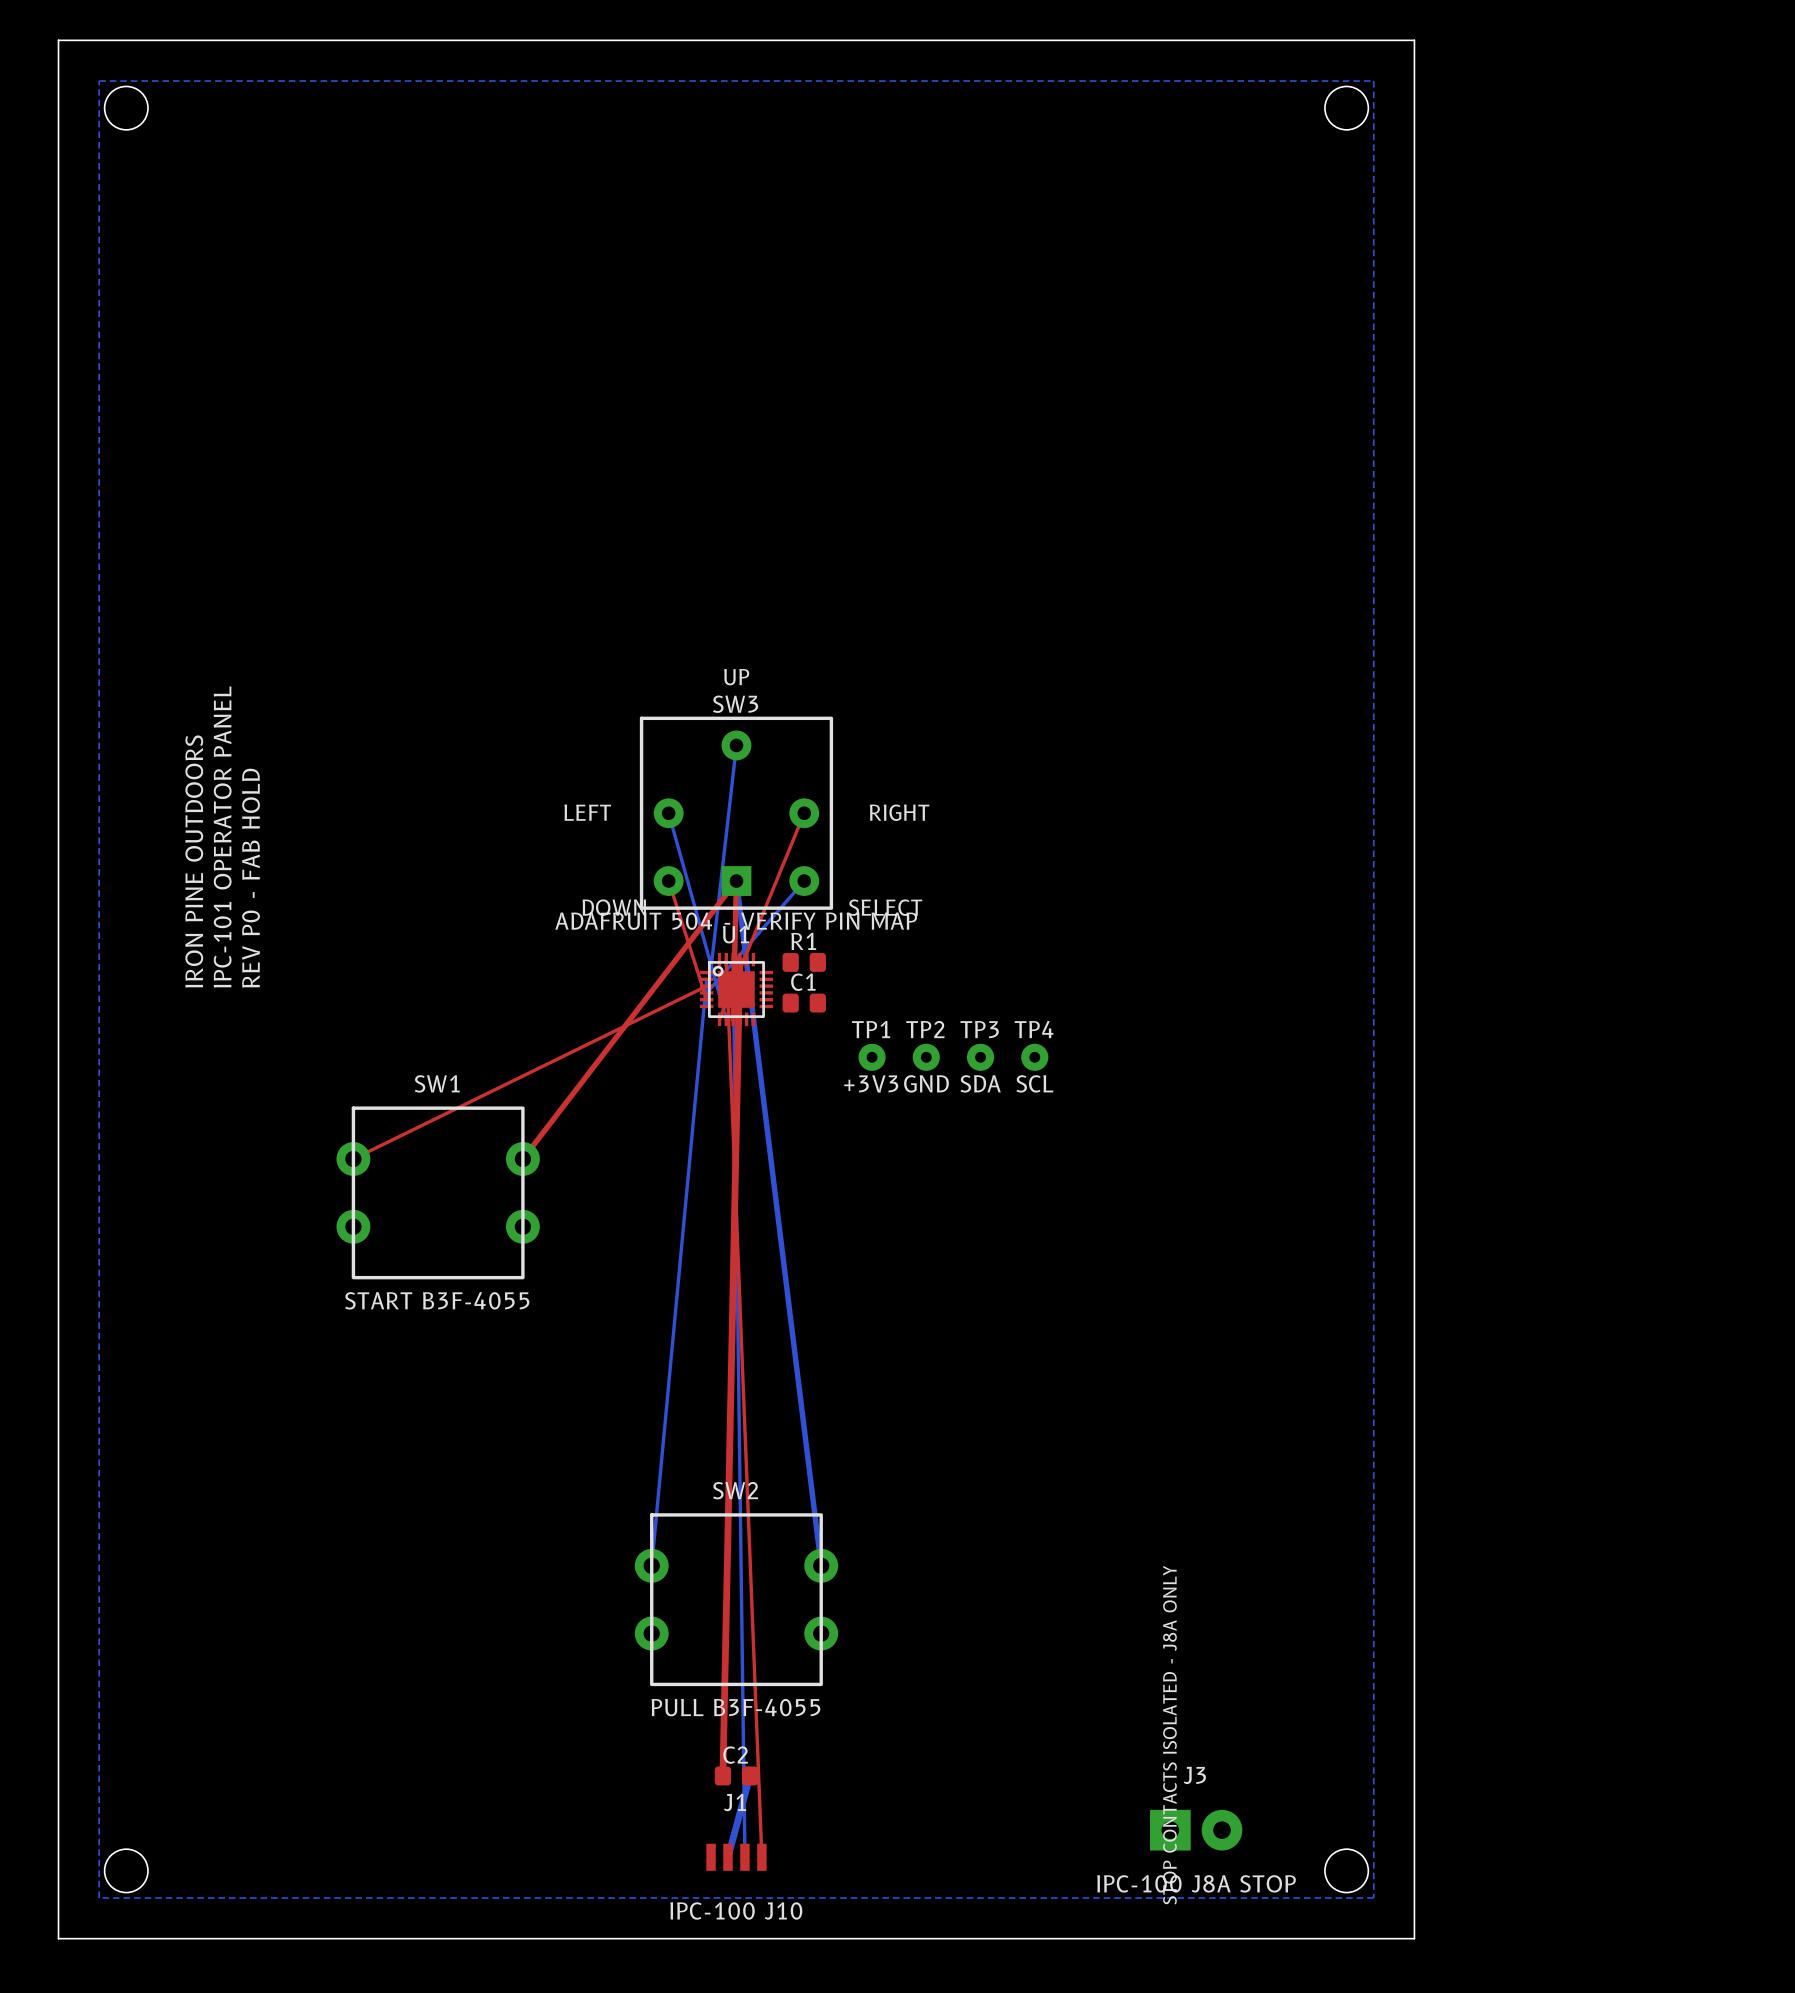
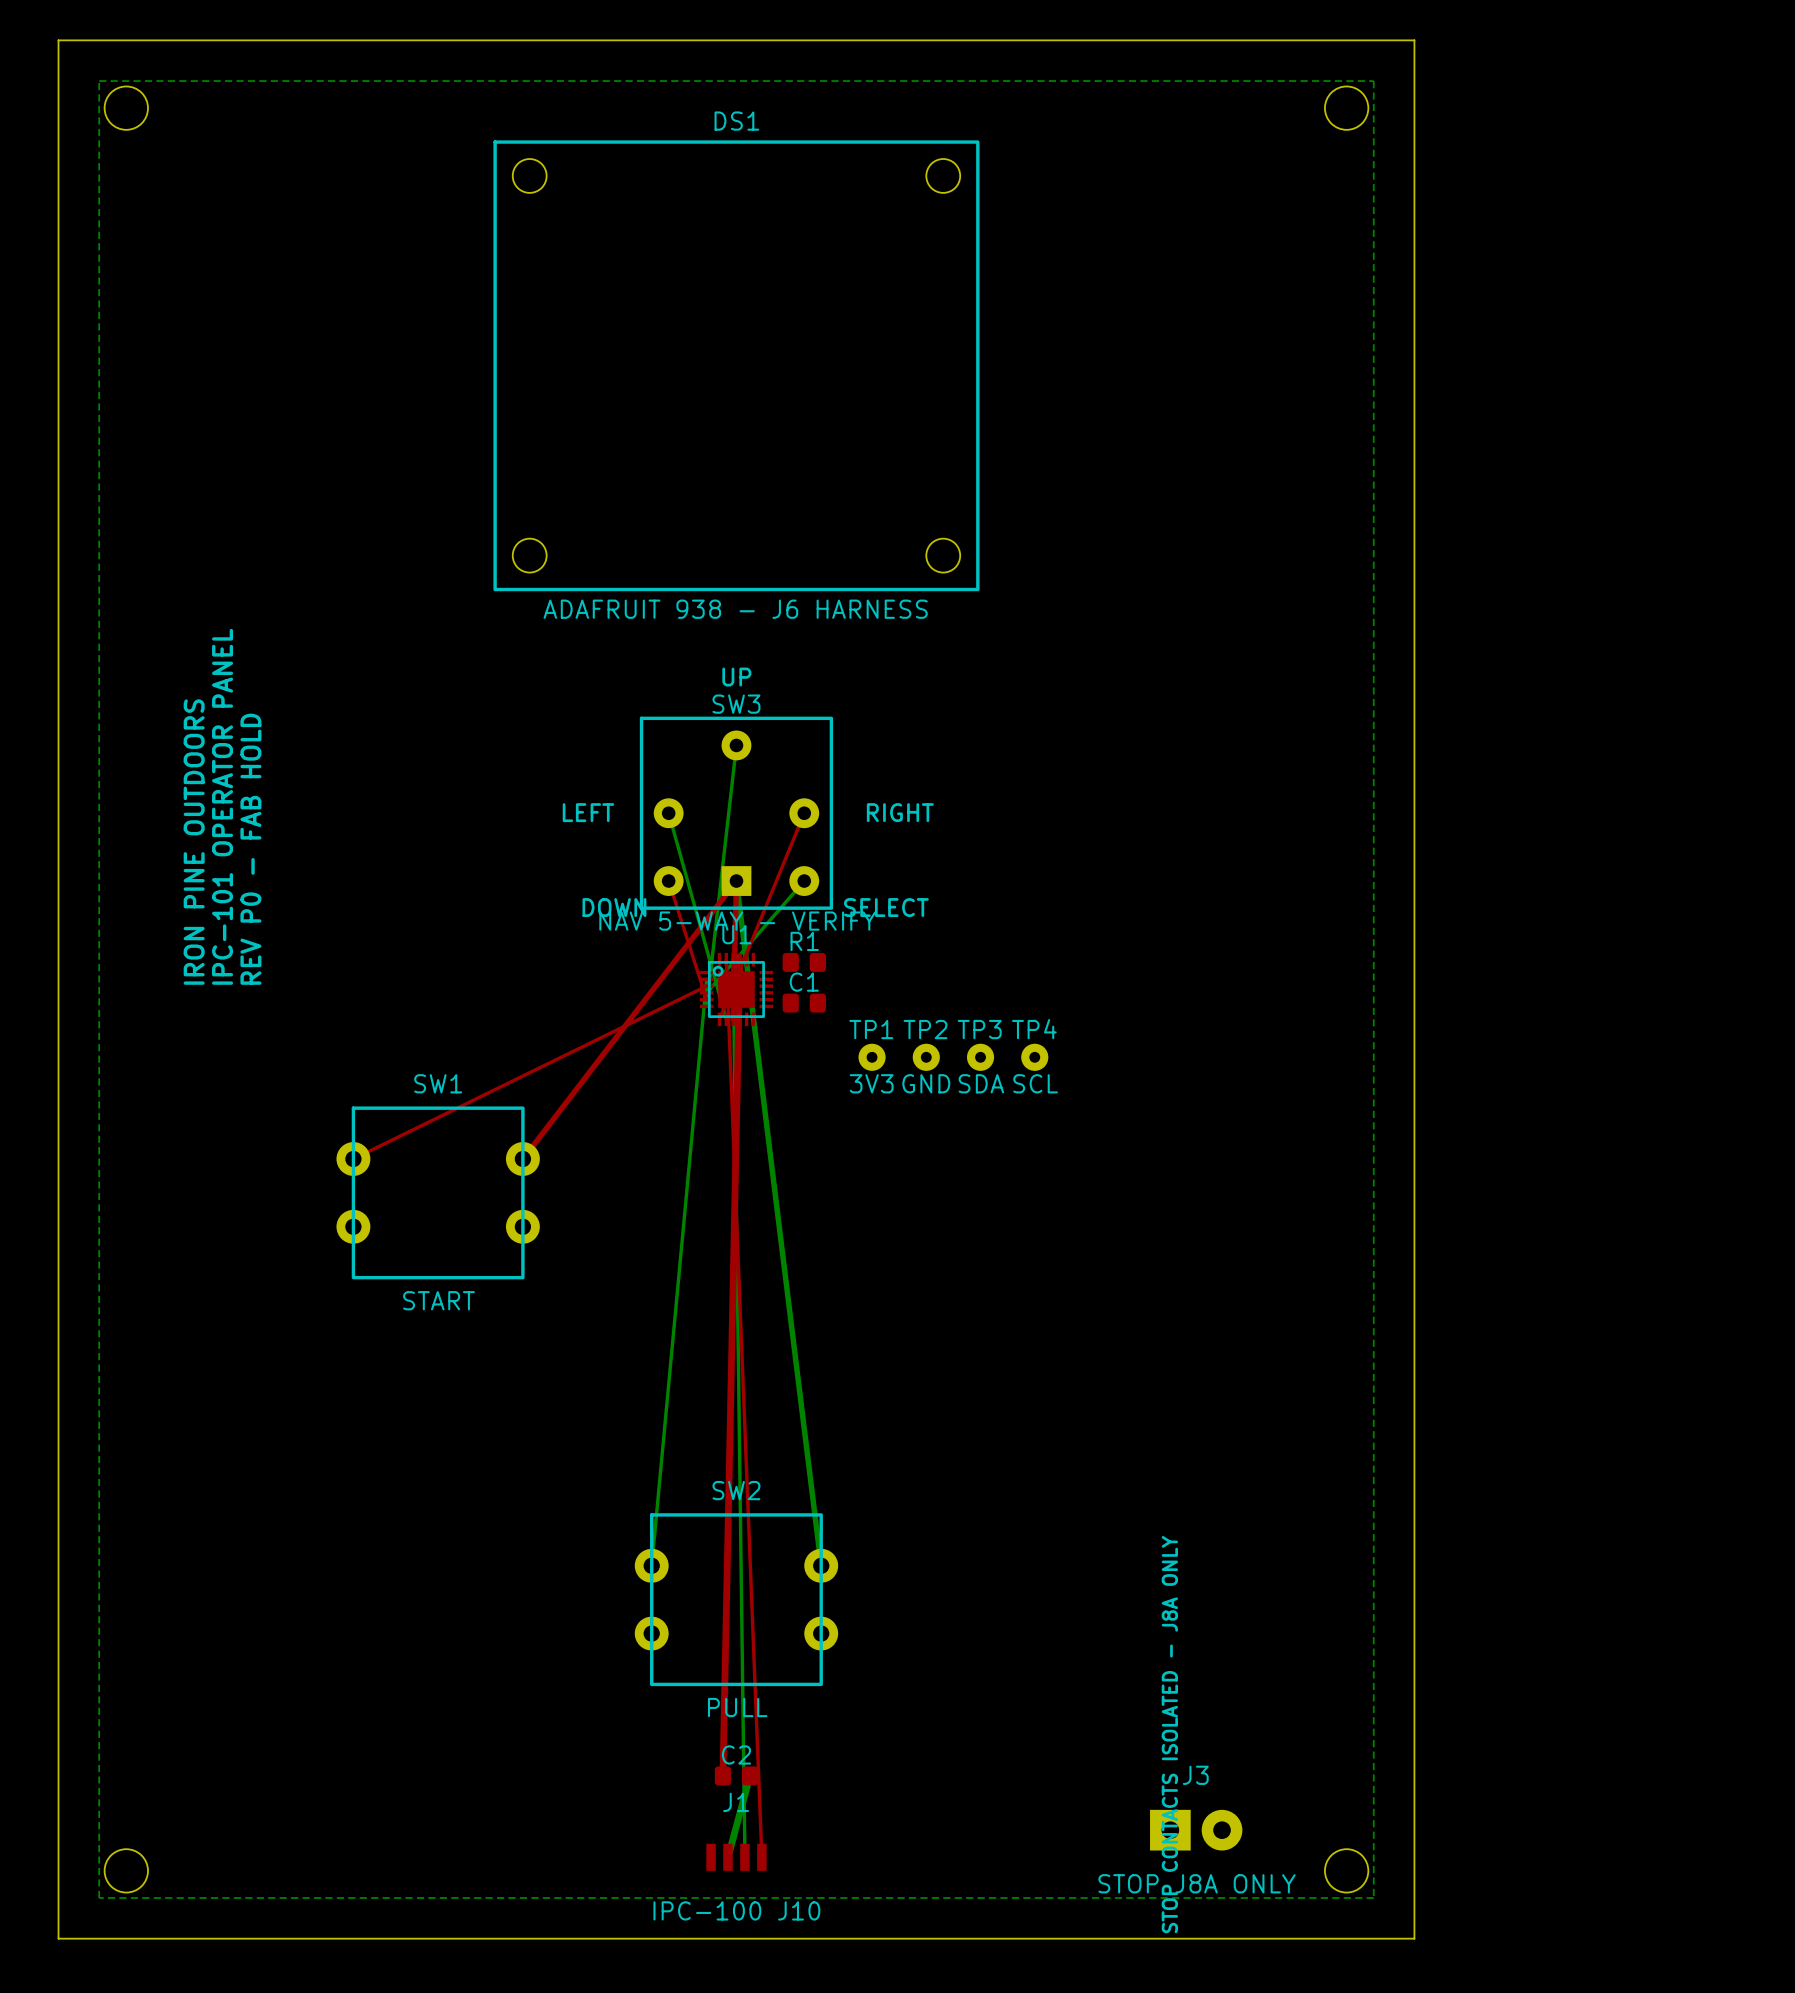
DS1: none -> ADAFRUIT 938 - J6 HARNESS (736, 365)
SW3 value: ADAFRUIT 504 - VERIFY PIN MAP (736, 921) -> NAV 5-WAY - VERIFY (737, 921)
TP1 value: +3V3 (871, 1083) -> 3V3 (871, 1083)
SW1 value: START B3F-4055 (437, 1300) -> START (438, 1300)
SW2 value: PULL B3F-4055 (735, 1707) -> PULL (737, 1707)
J3 value: IPC-100 J8A STOP (1196, 1883) -> STOP J8A ONLY (1197, 1883)

